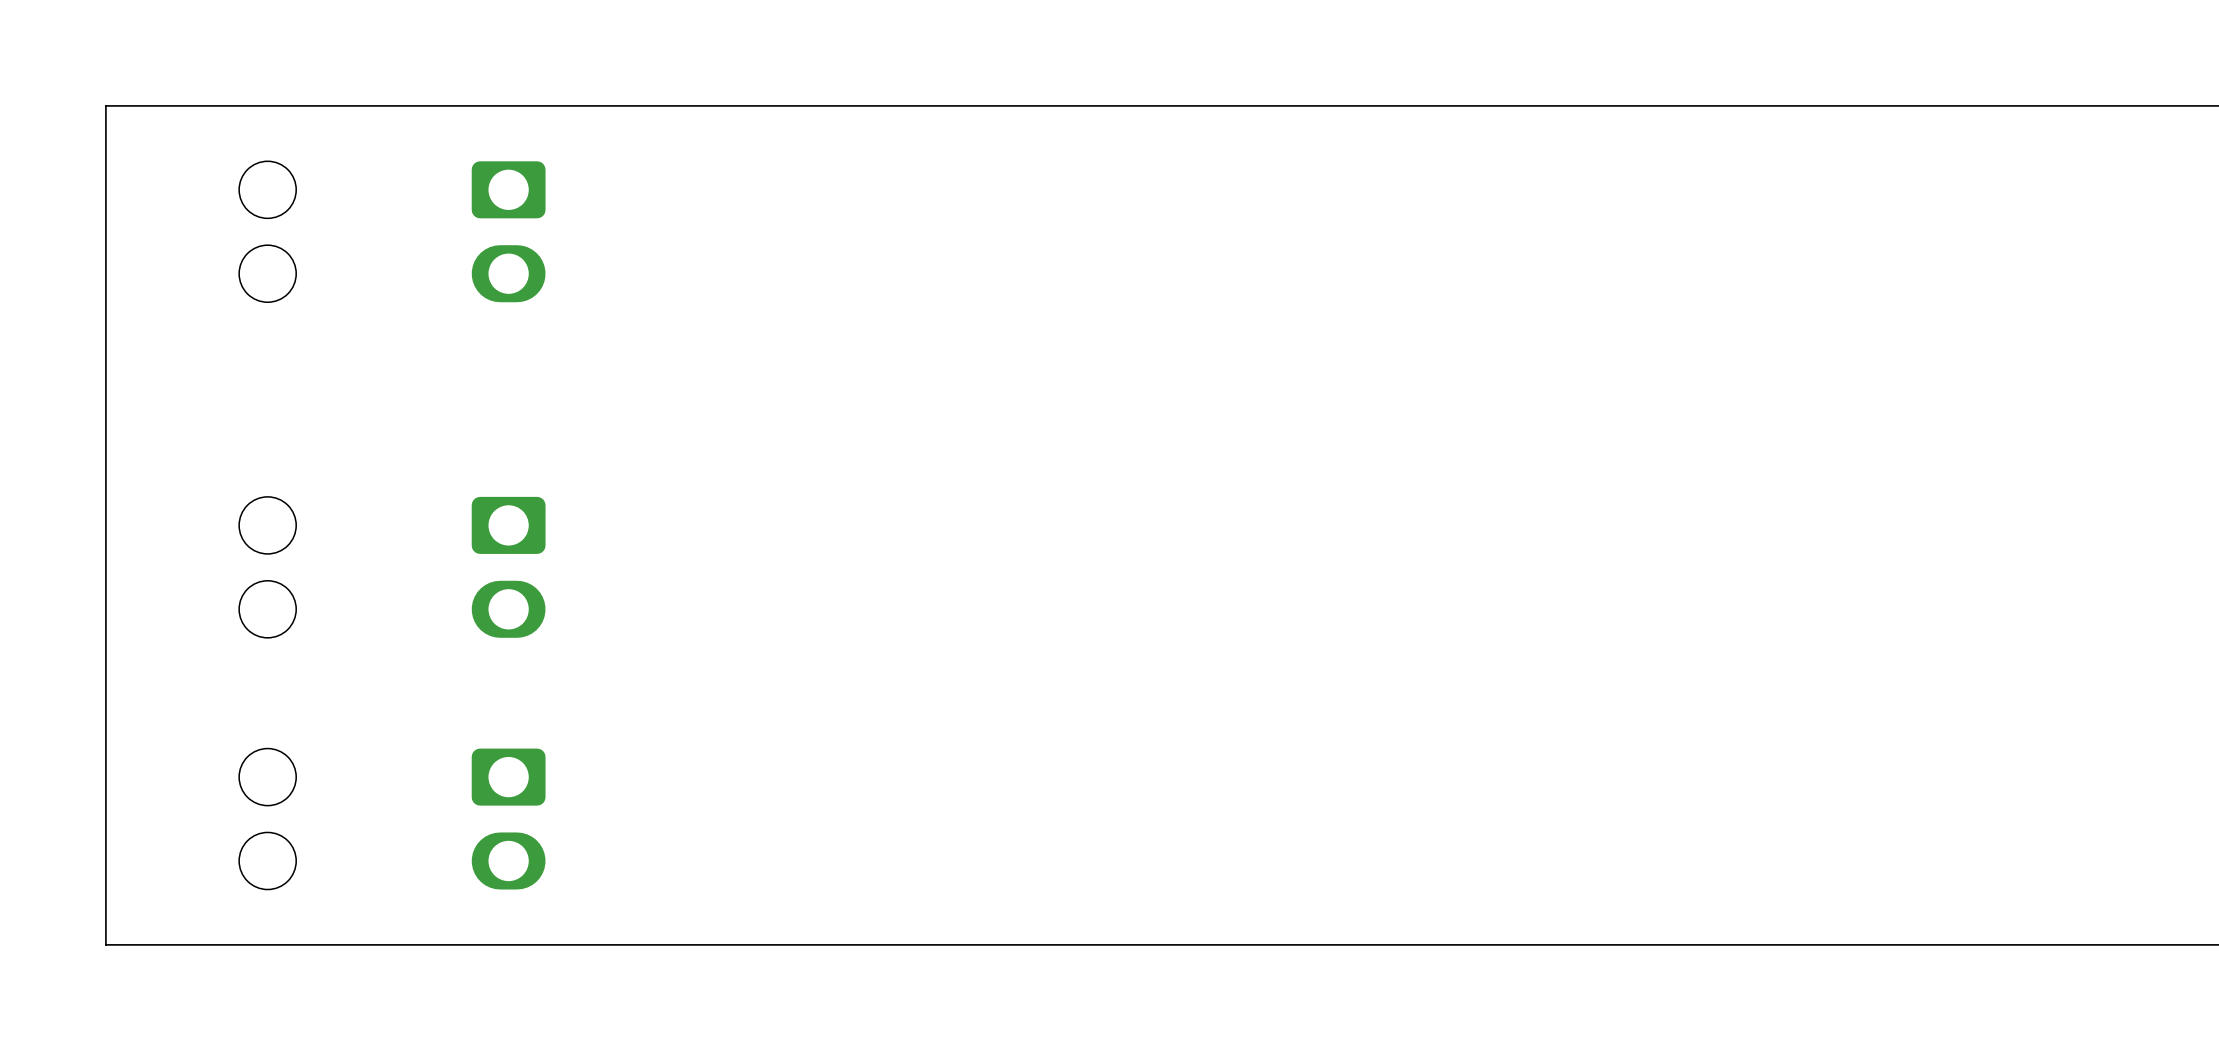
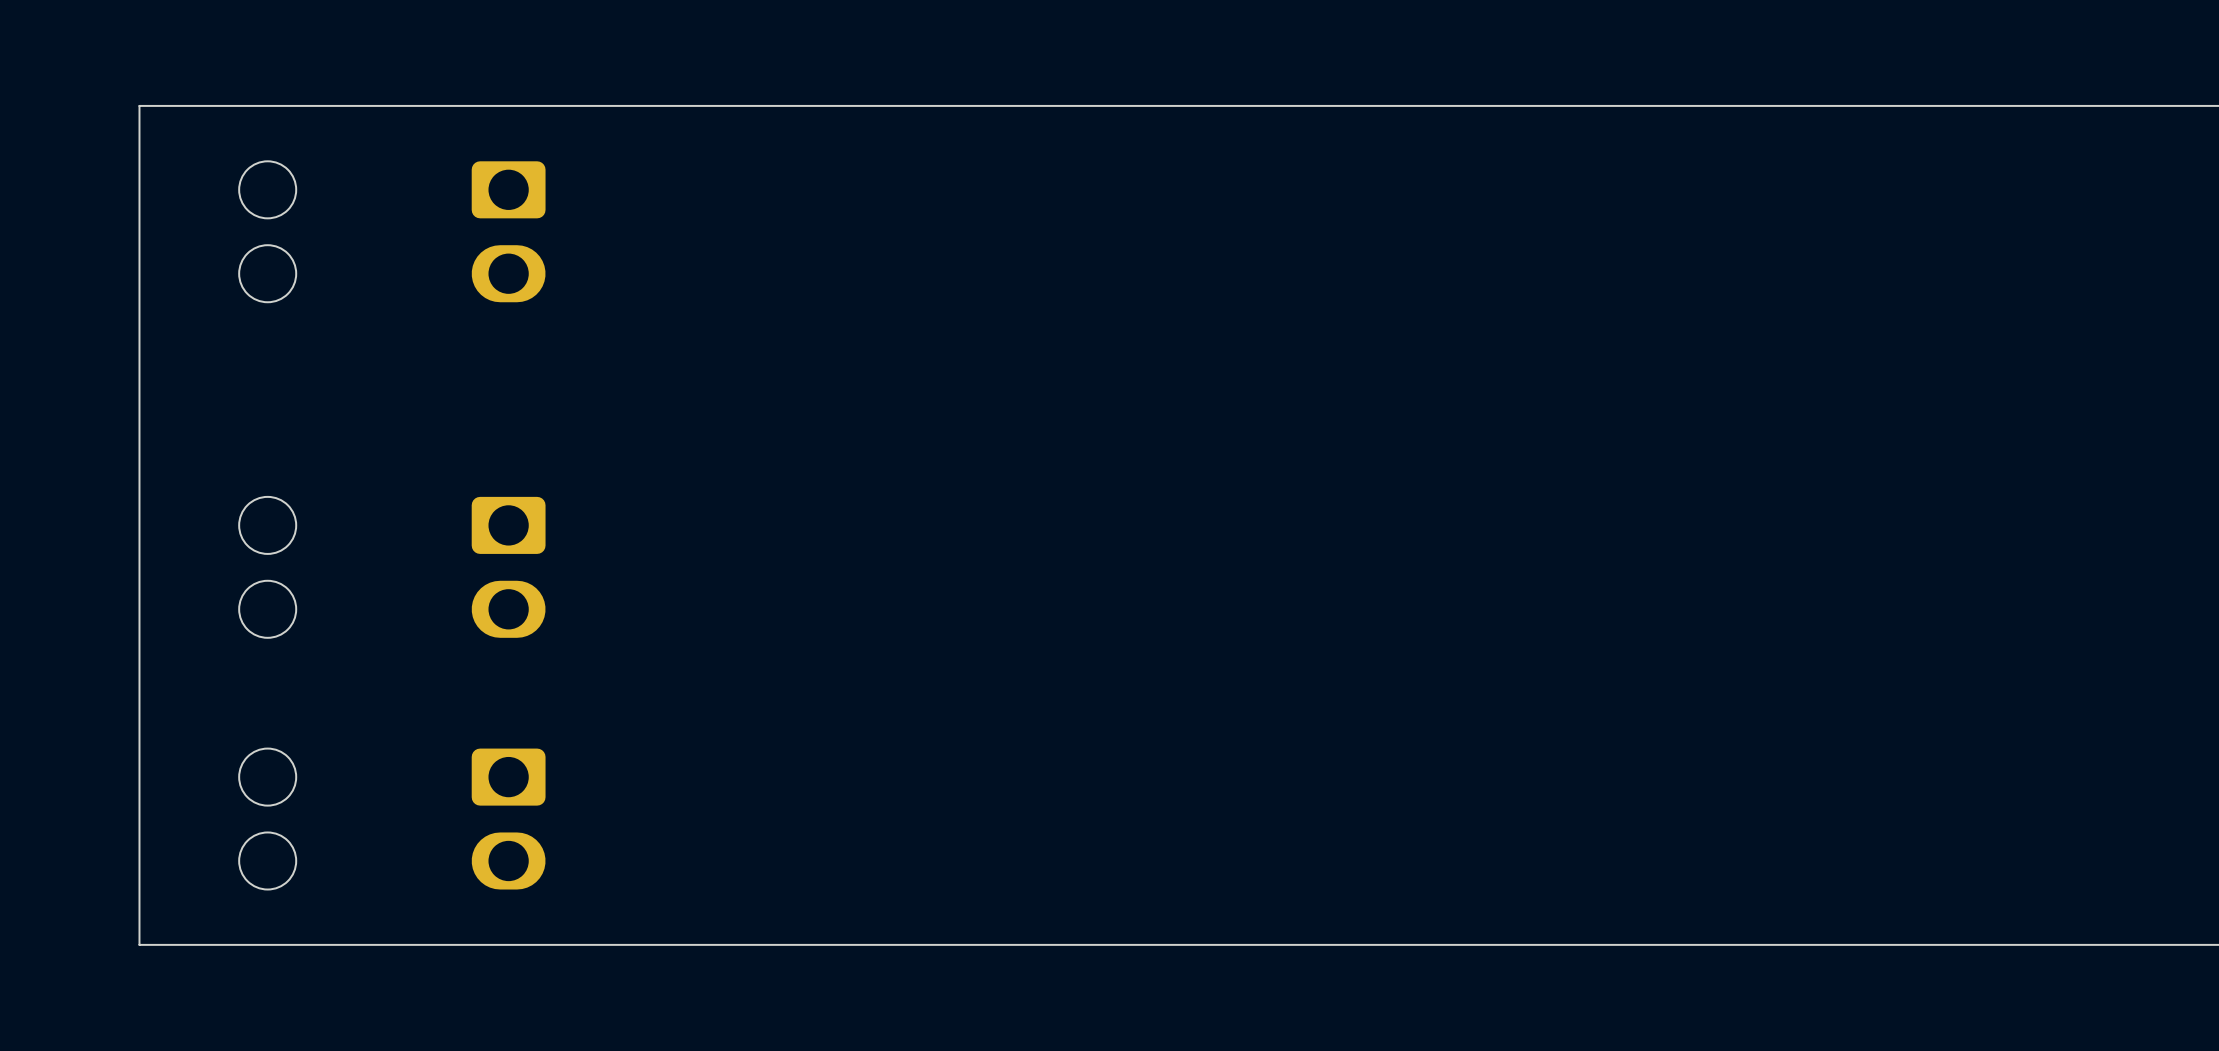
board edge: (139, 105) (105, 105) (105, 944) (139, 944) -> (139, 105) (139, 944)

